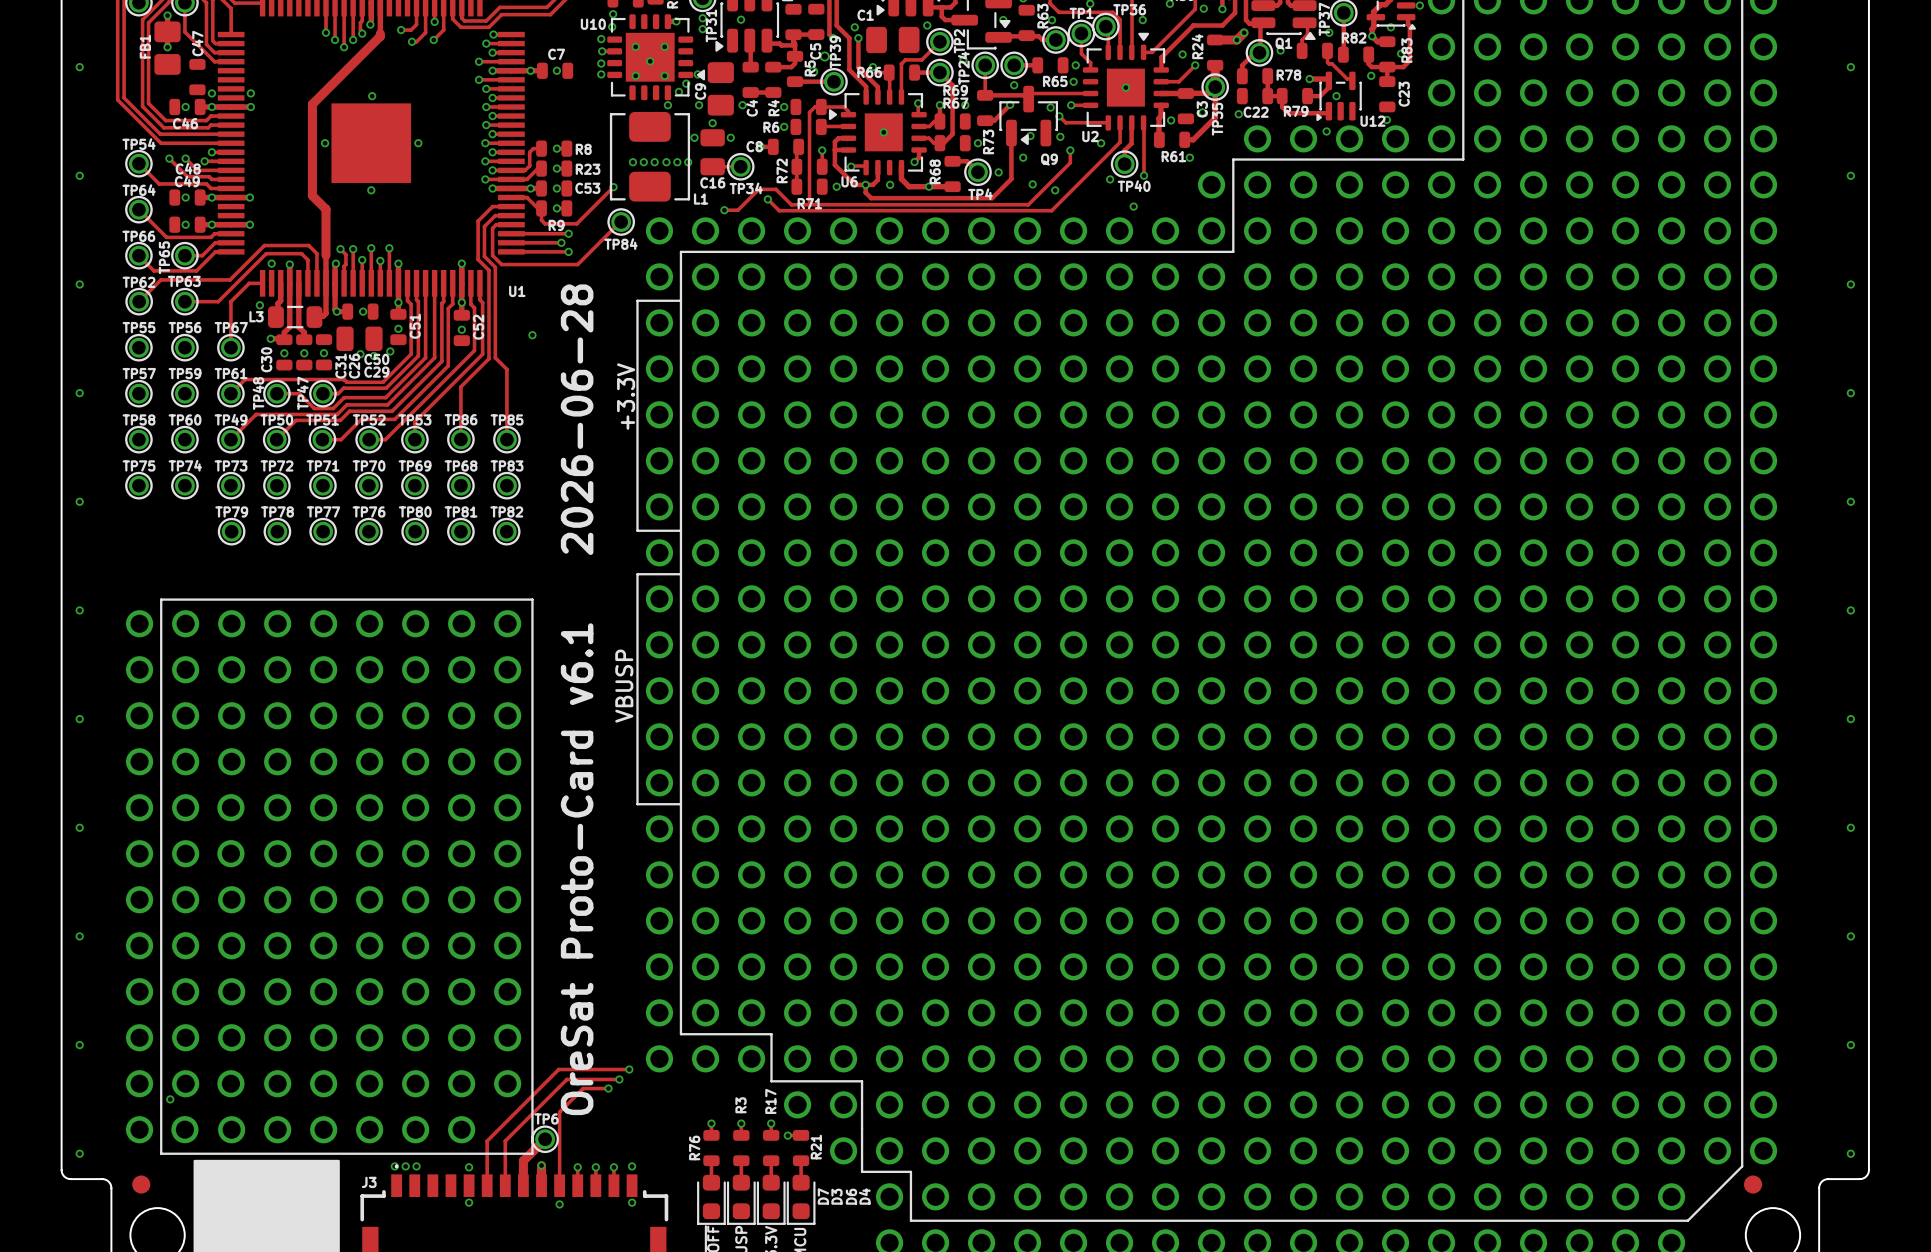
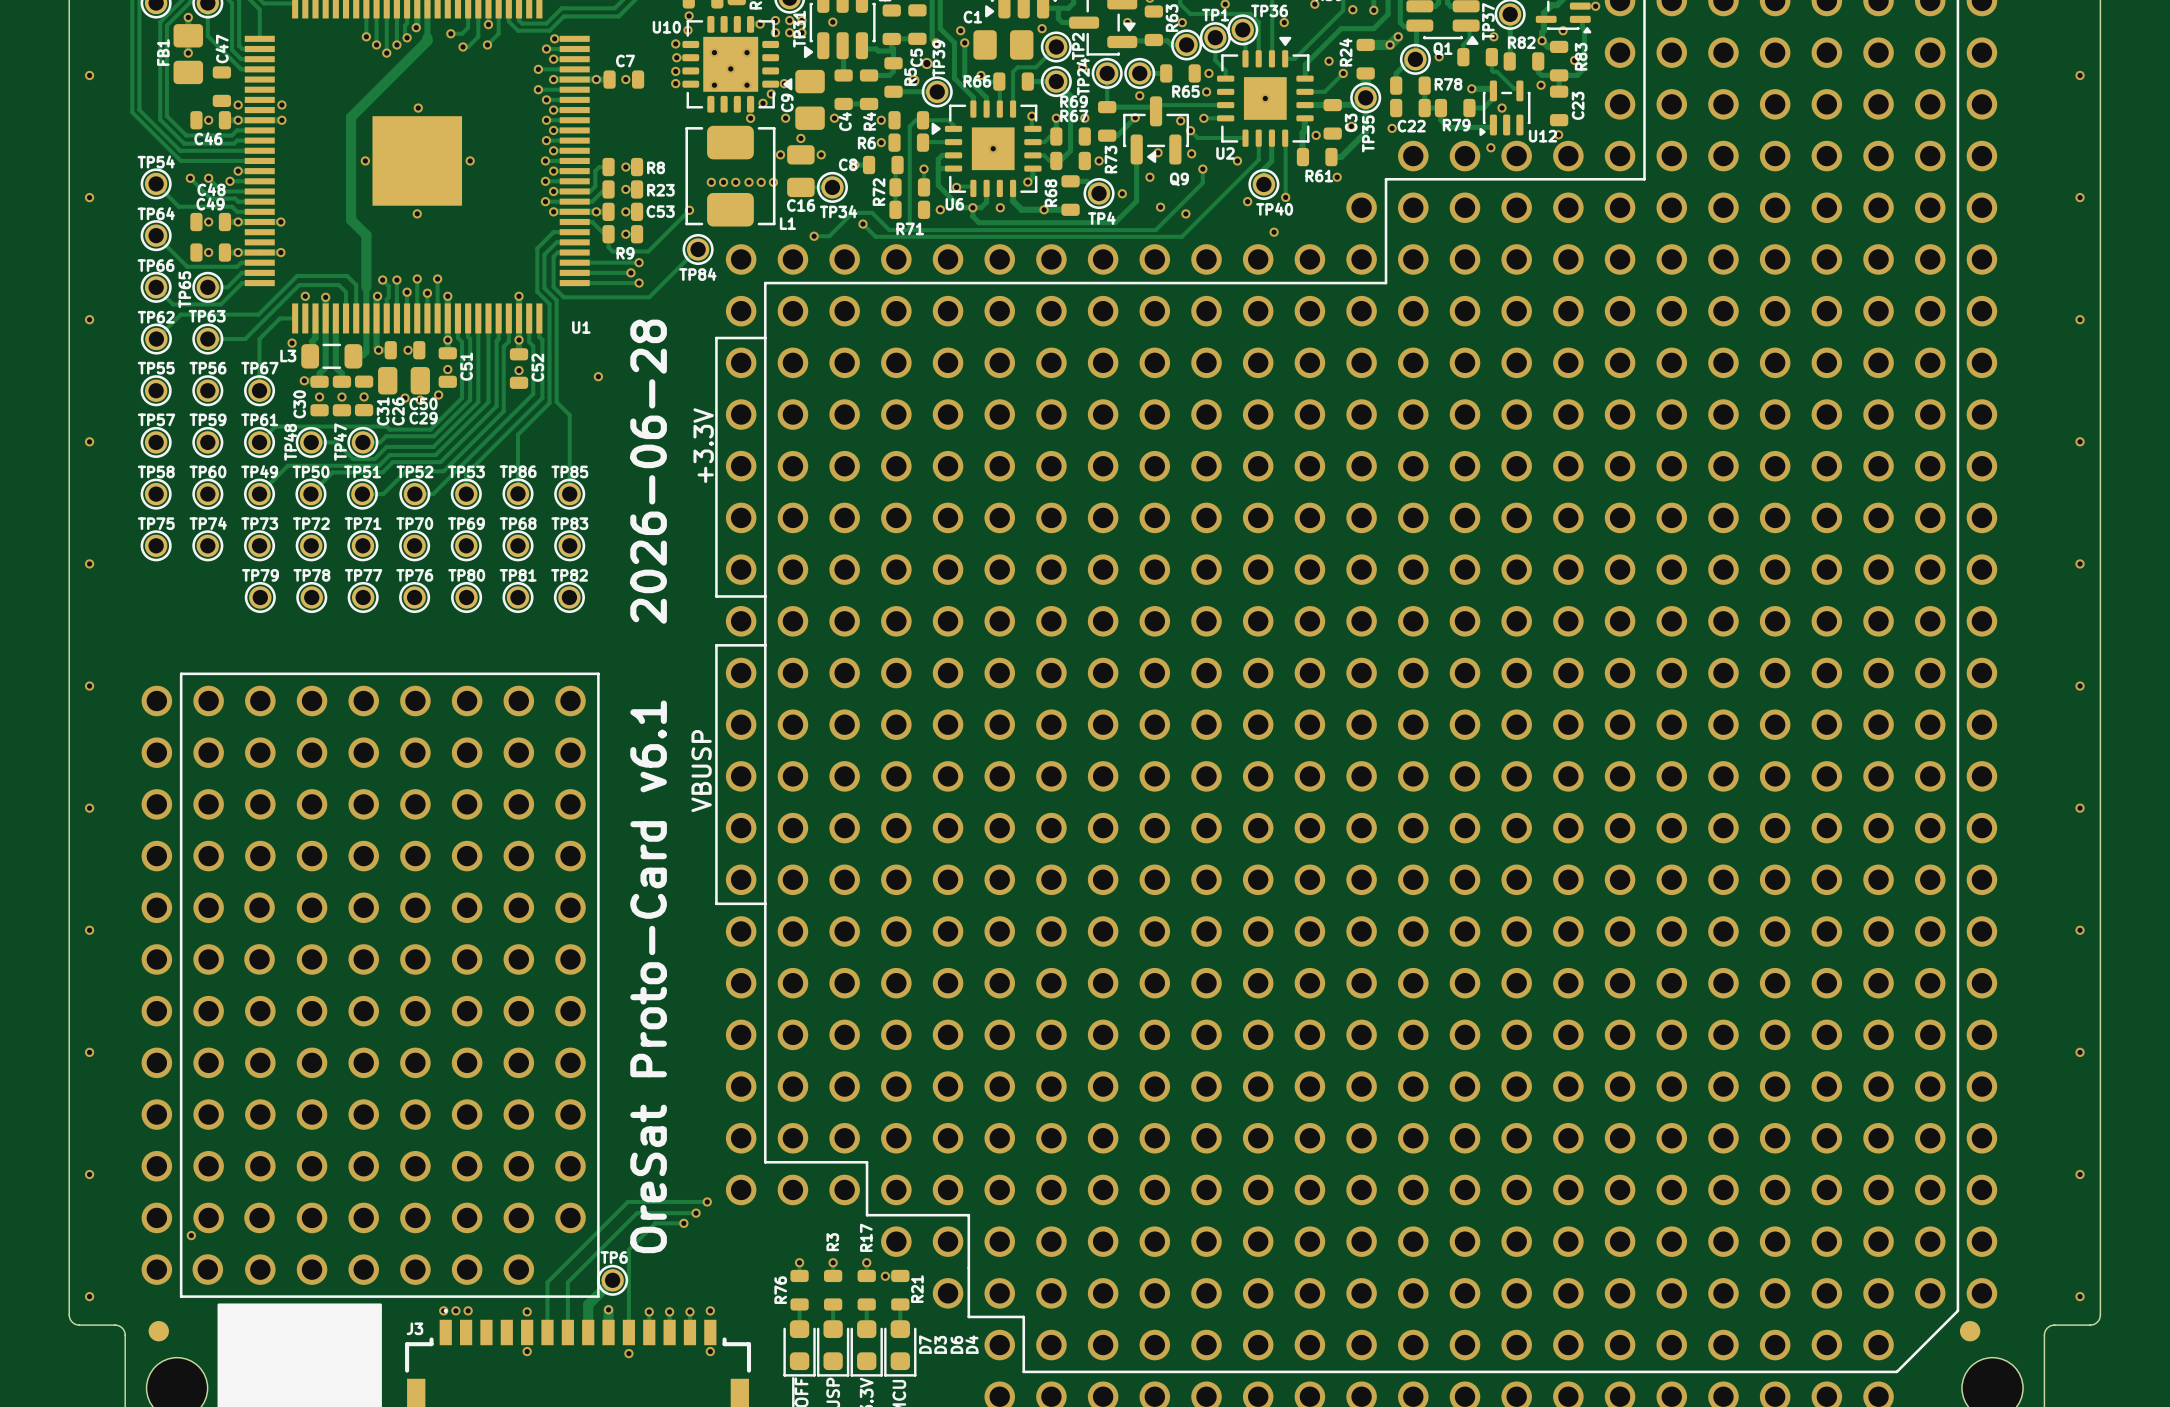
via: none -> (775, 20)
via: none -> (801, 20)
via: none -> (775, 32)
via: none -> (801, 32)

